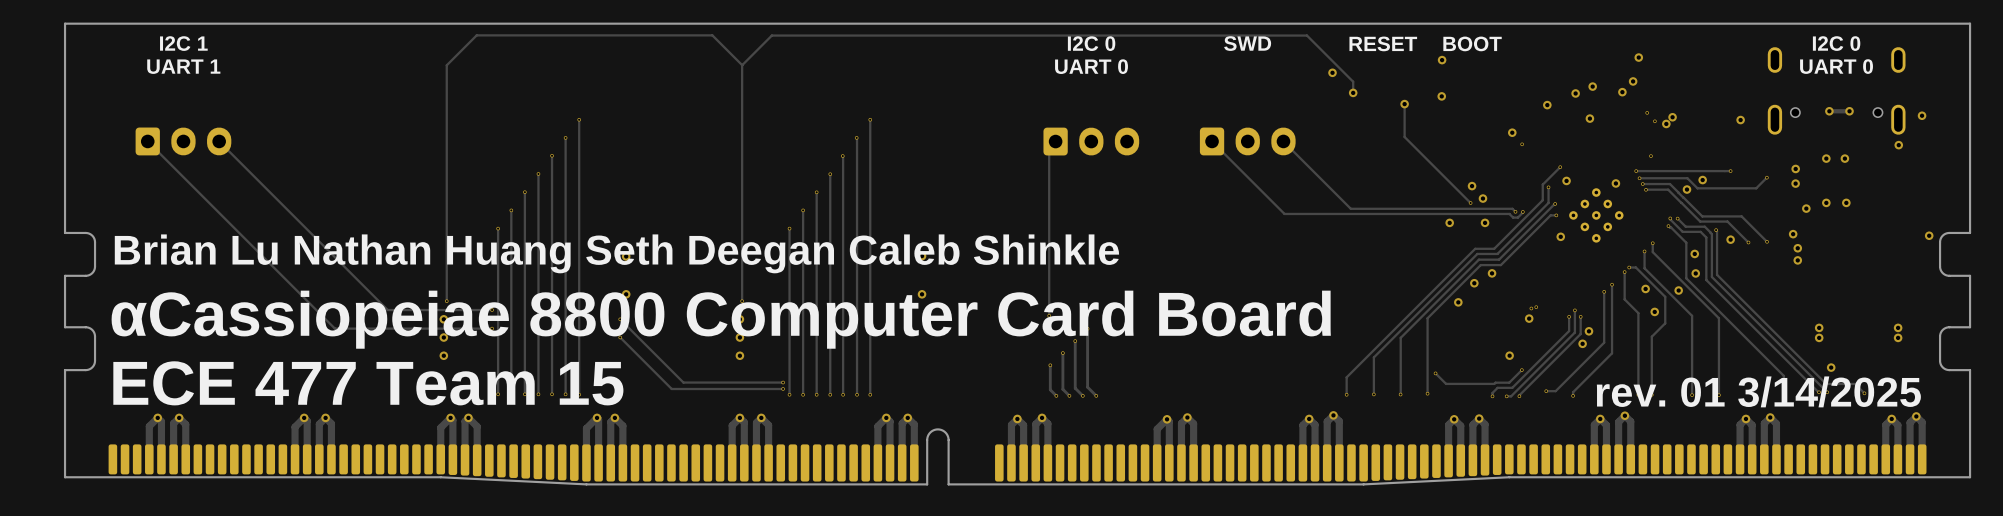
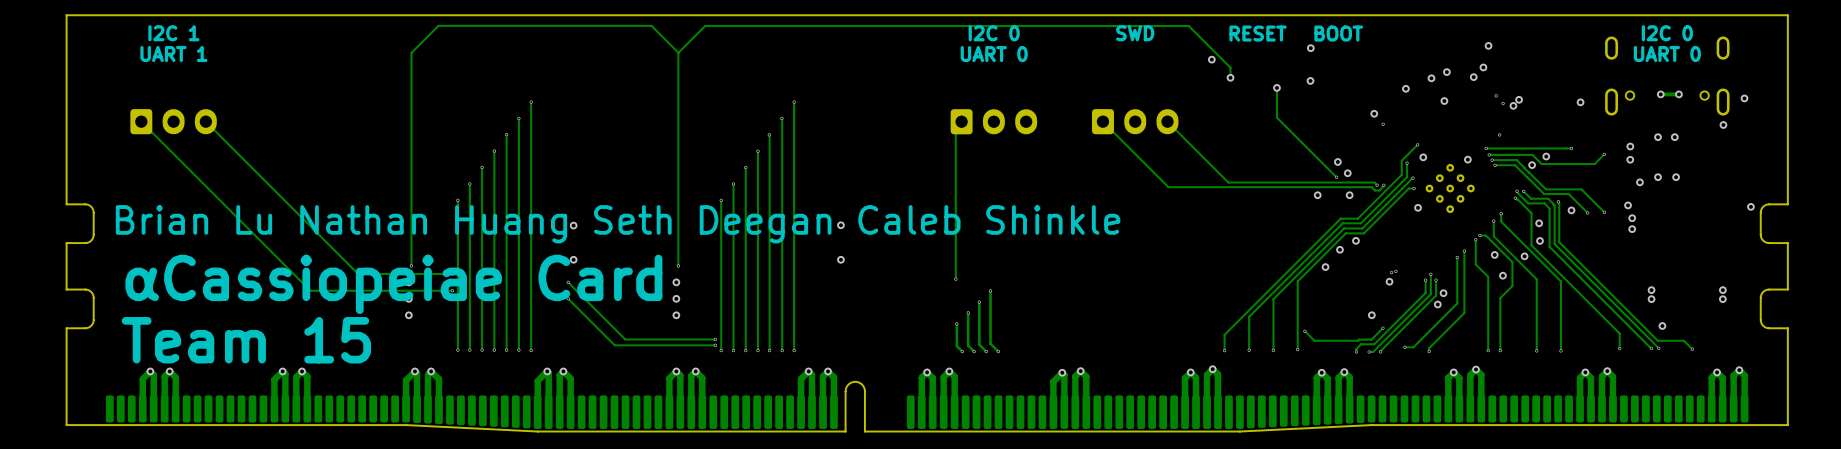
text: αCassiopeiae 8800 Computer Card Board (721, 319) -> αCassiopeiae Card (393, 284)
text: ECE 477 Team 15 (368, 383) -> Team 15 (246, 340)
text: rev. 01 3/14/2025 (1758, 391) -> none

